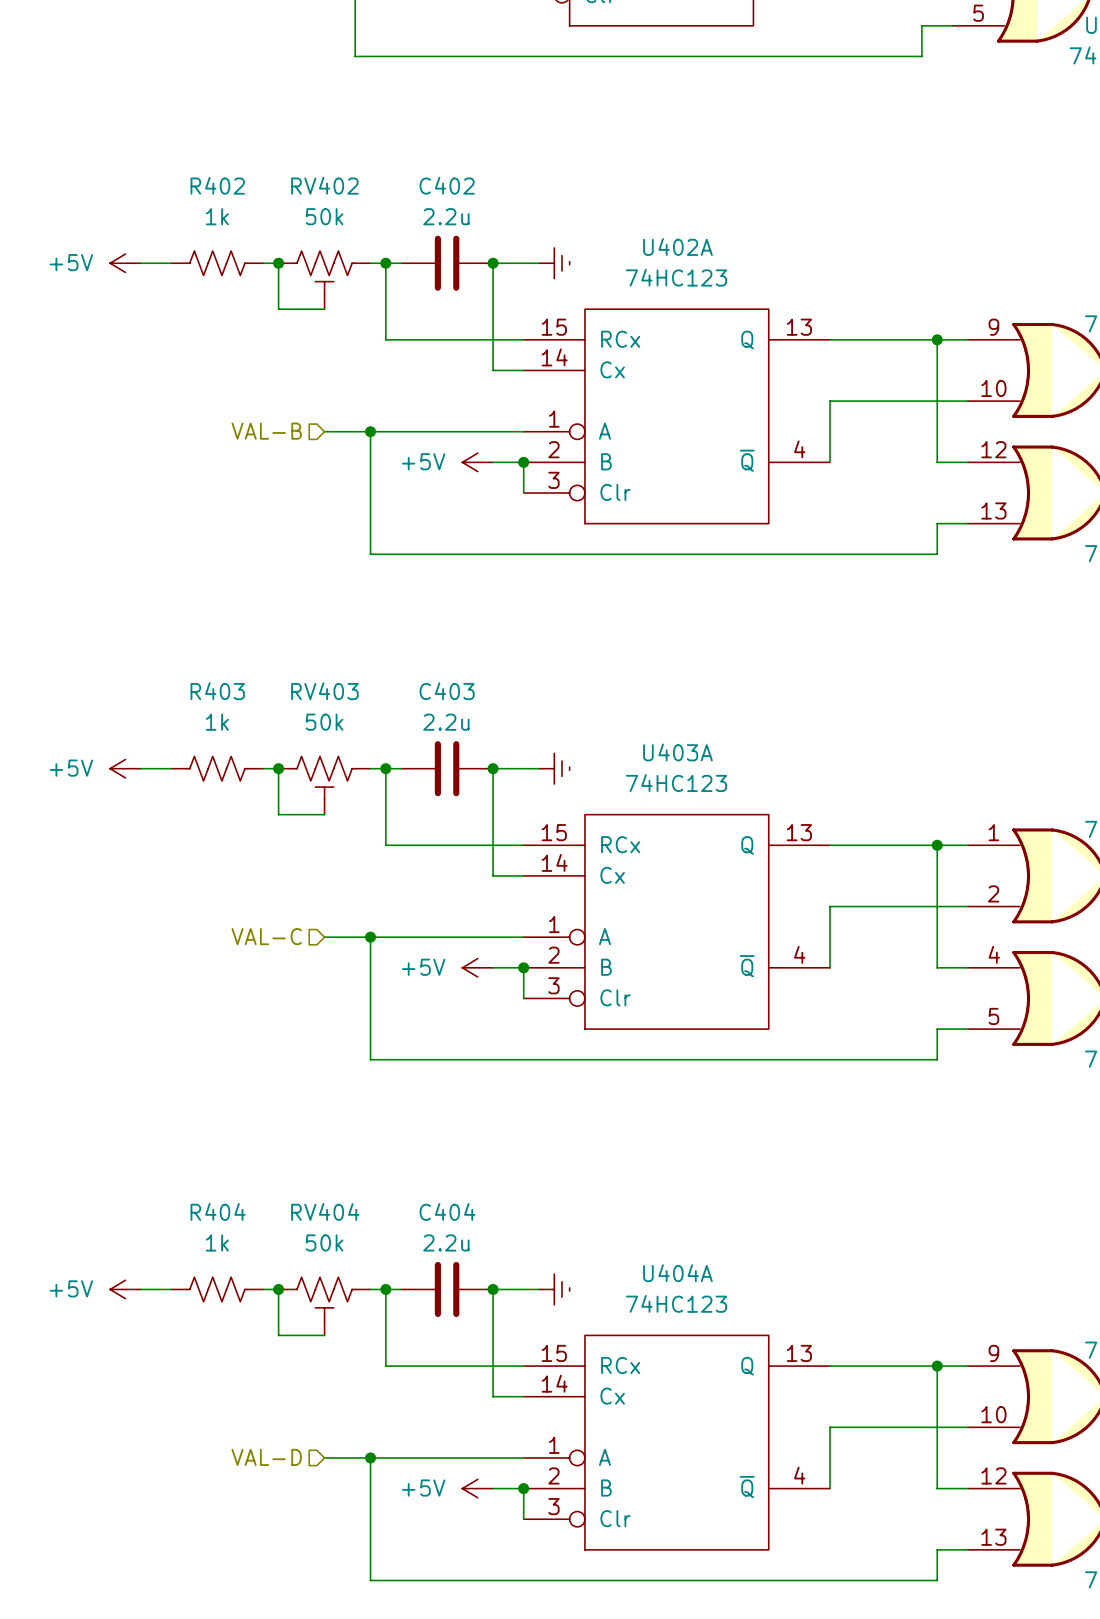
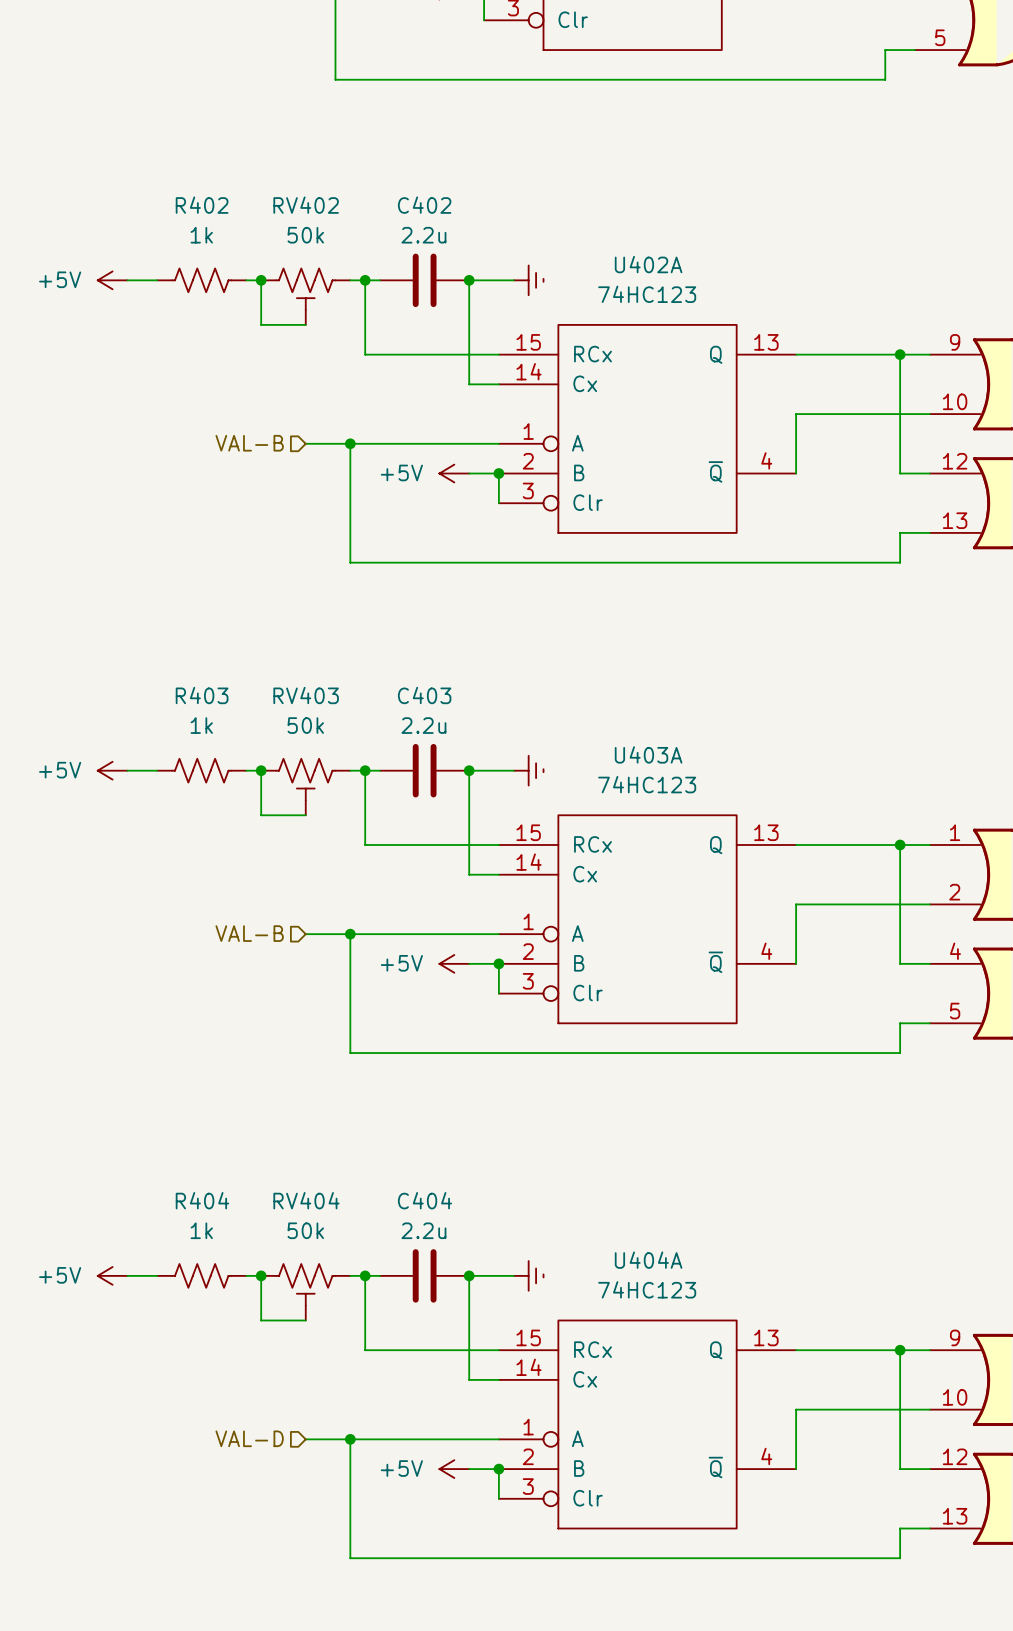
hierarchical label: VAL-C (266, 936) -> VAL-B (249, 933)

